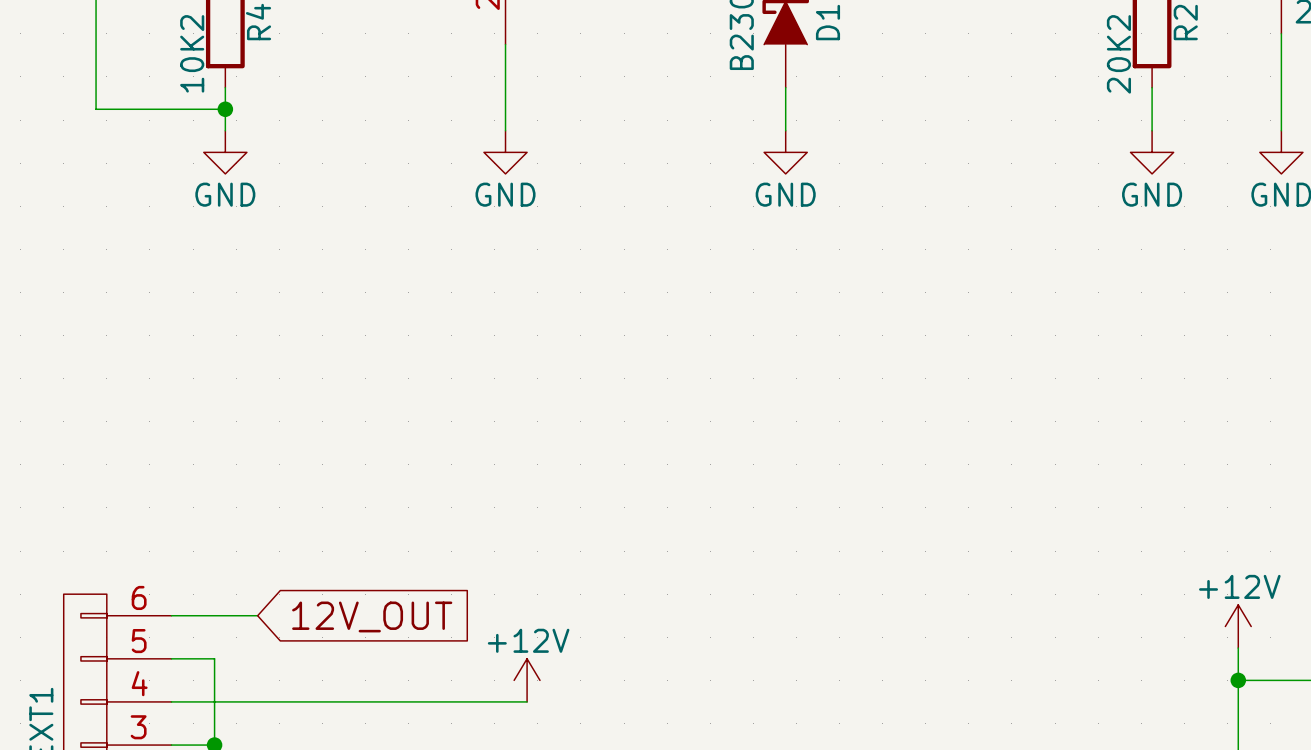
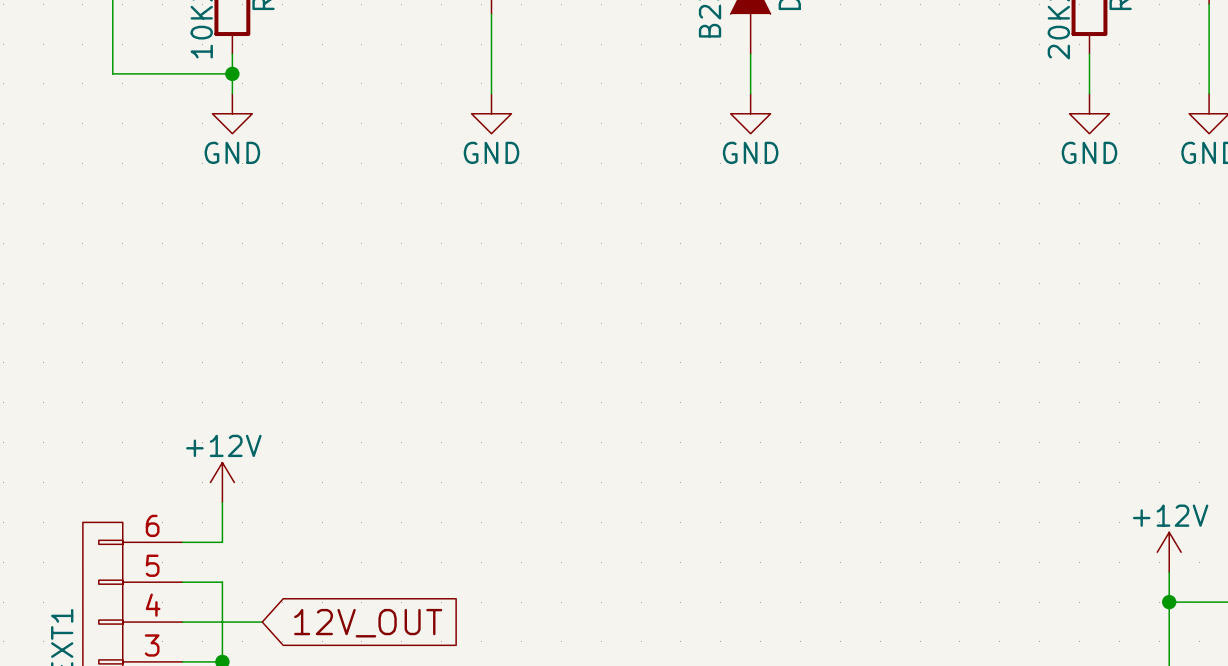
wire: (214, 615) (257, 615) -> (222, 542) (222, 502)
global label position: 12V_OUT (372, 616) -> 12V_OUT (368, 623)
power symbol position: +12V (527, 680) -> +12V (222, 482)
wire: (257, 701) (527, 701) -> none

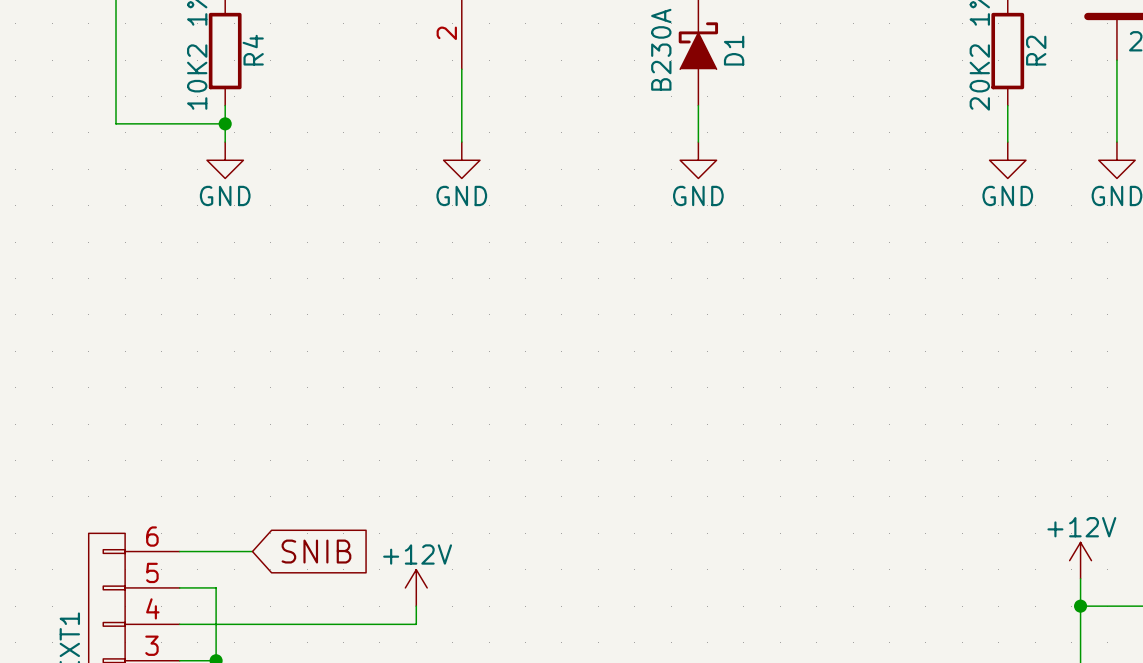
power symbol position: +12V (222, 482) -> +12V (416, 587)
wire: (222, 502) (222, 542) -> (252, 551) (216, 551)
global label: none -> SNIB (316, 551)
wire: none -> (416, 606) (416, 624) (252, 624)
global label: 12V_OUT (368, 623) -> none

